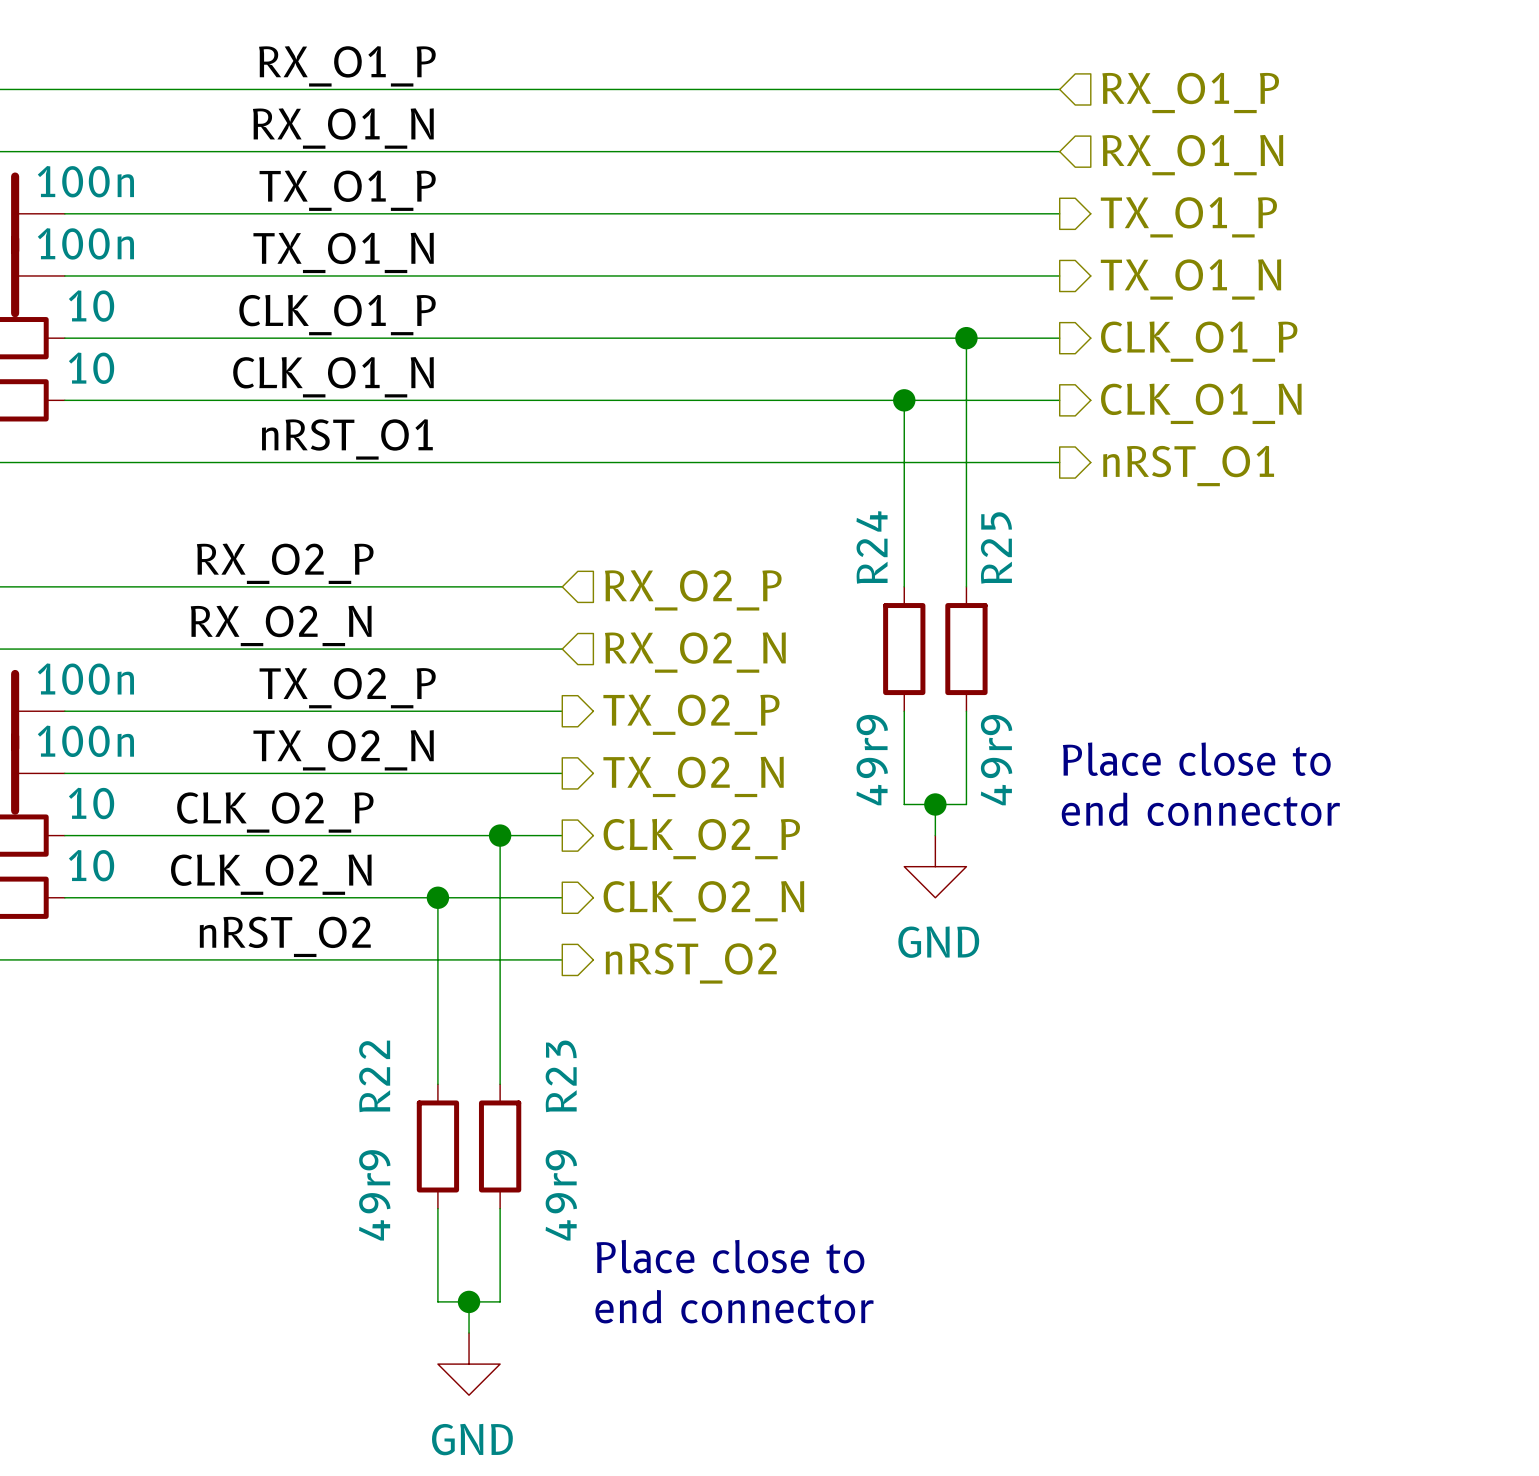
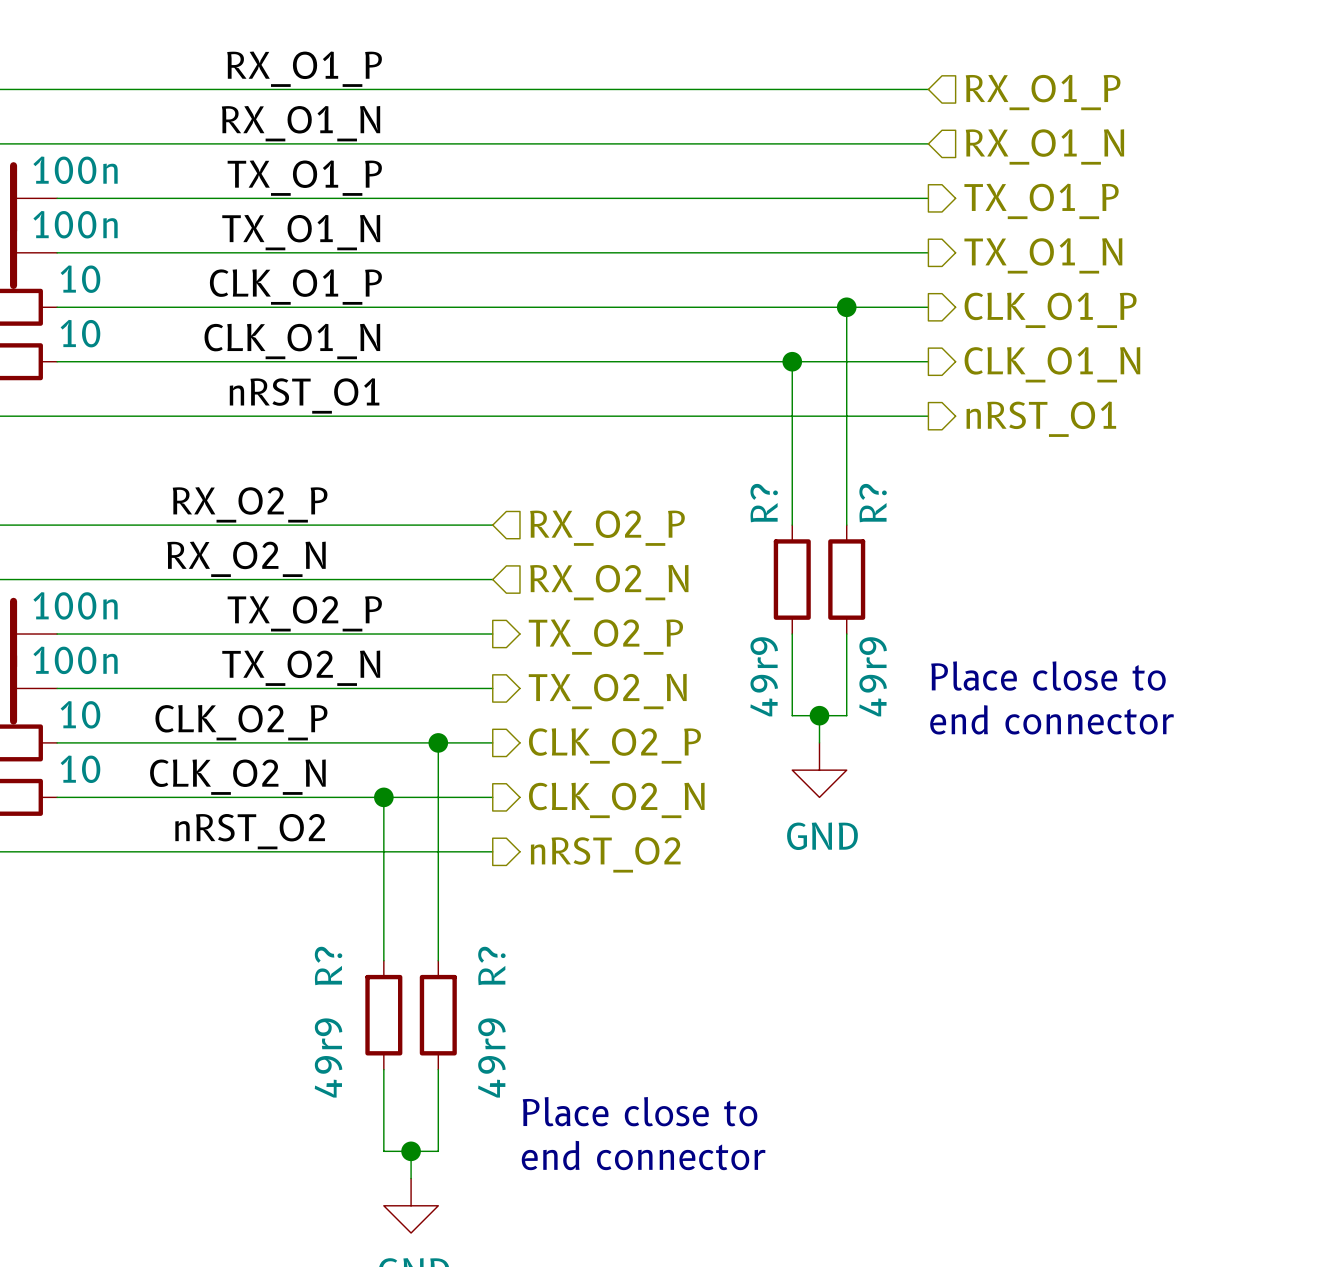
R24 name: R24 (872, 547) -> R? (764, 503)
R25 name: R25 (996, 547) -> R? (873, 503)
R22 name: R22 (374, 1076) -> R? (328, 965)
R23 name: R23 (561, 1076) -> R? (491, 965)

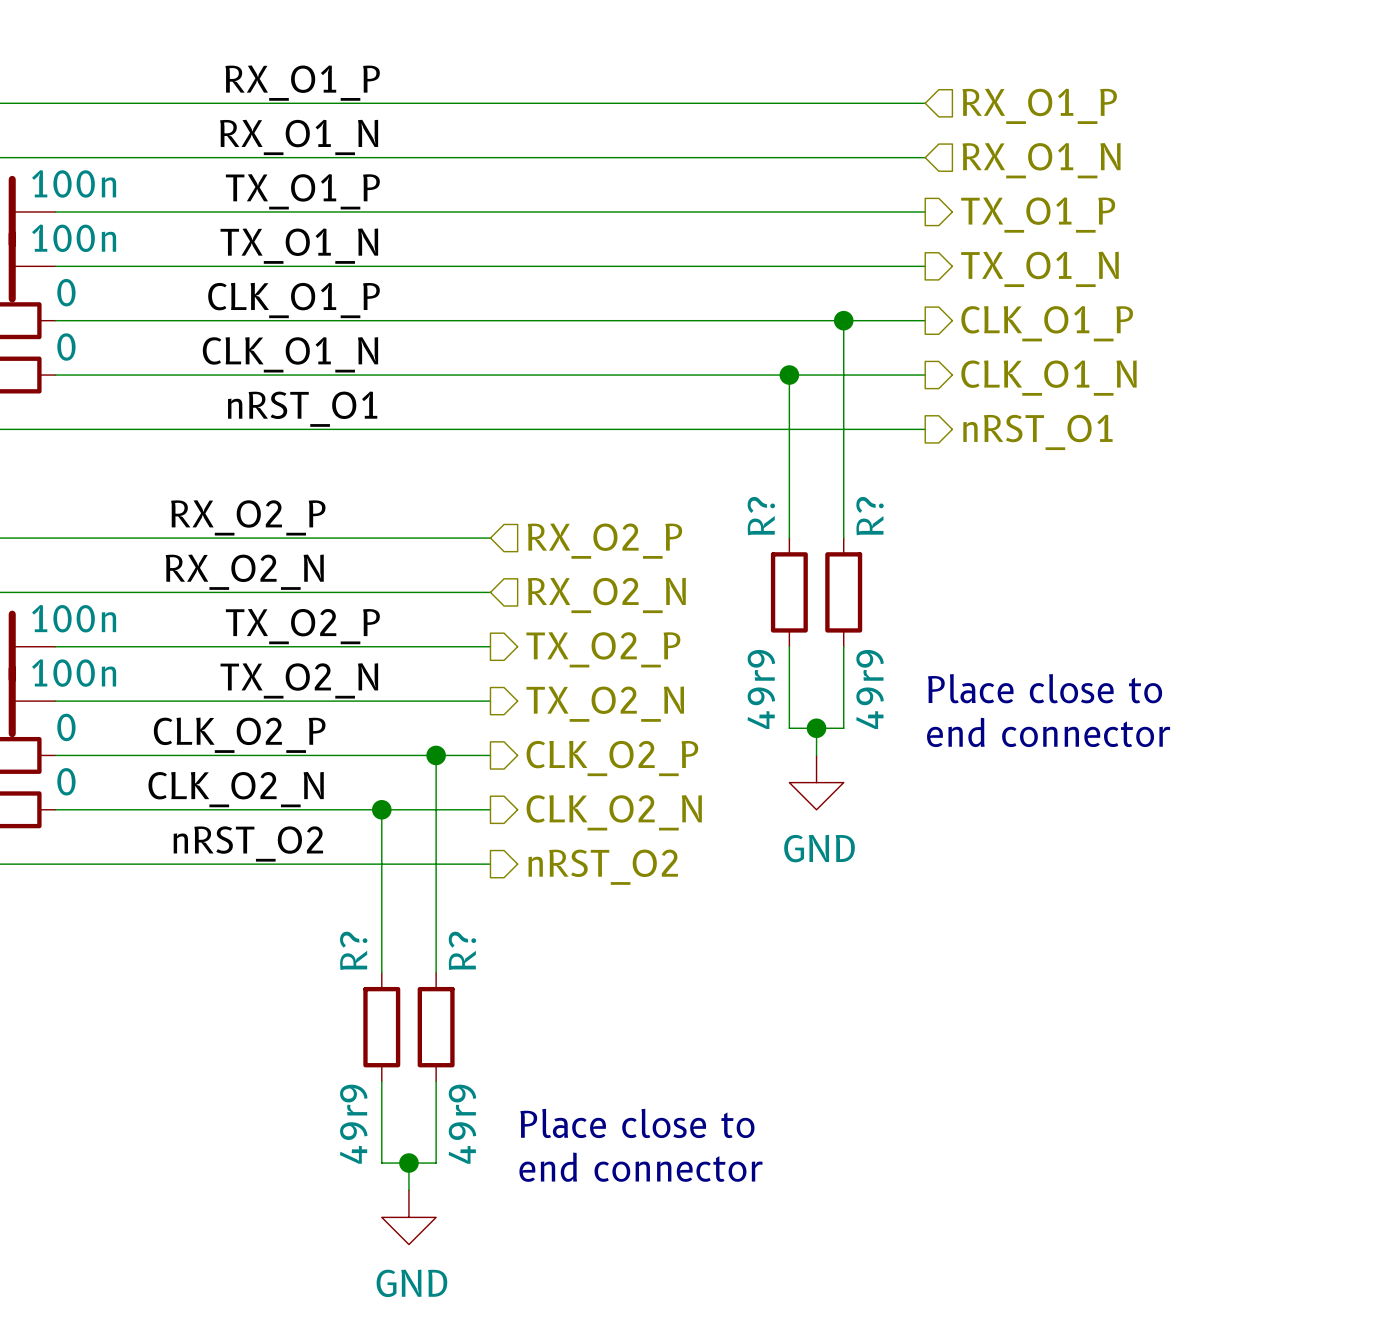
part value: 10 (80, 279) -> 0 (66, 292)
part value: 10 (80, 333) -> 0 (66, 347)
part value: 10 (80, 714) -> 0 (66, 727)
part value: 10 (80, 769) -> 0 (66, 781)
R? name position: R? (328, 965) -> R? (353, 950)
R? name position: R? (491, 965) -> R? (462, 950)
R? value position: 49r9 (328, 1057) -> 49r9 (353, 1124)
R? value position: 49r9 (491, 1057) -> 49r9 (462, 1124)

